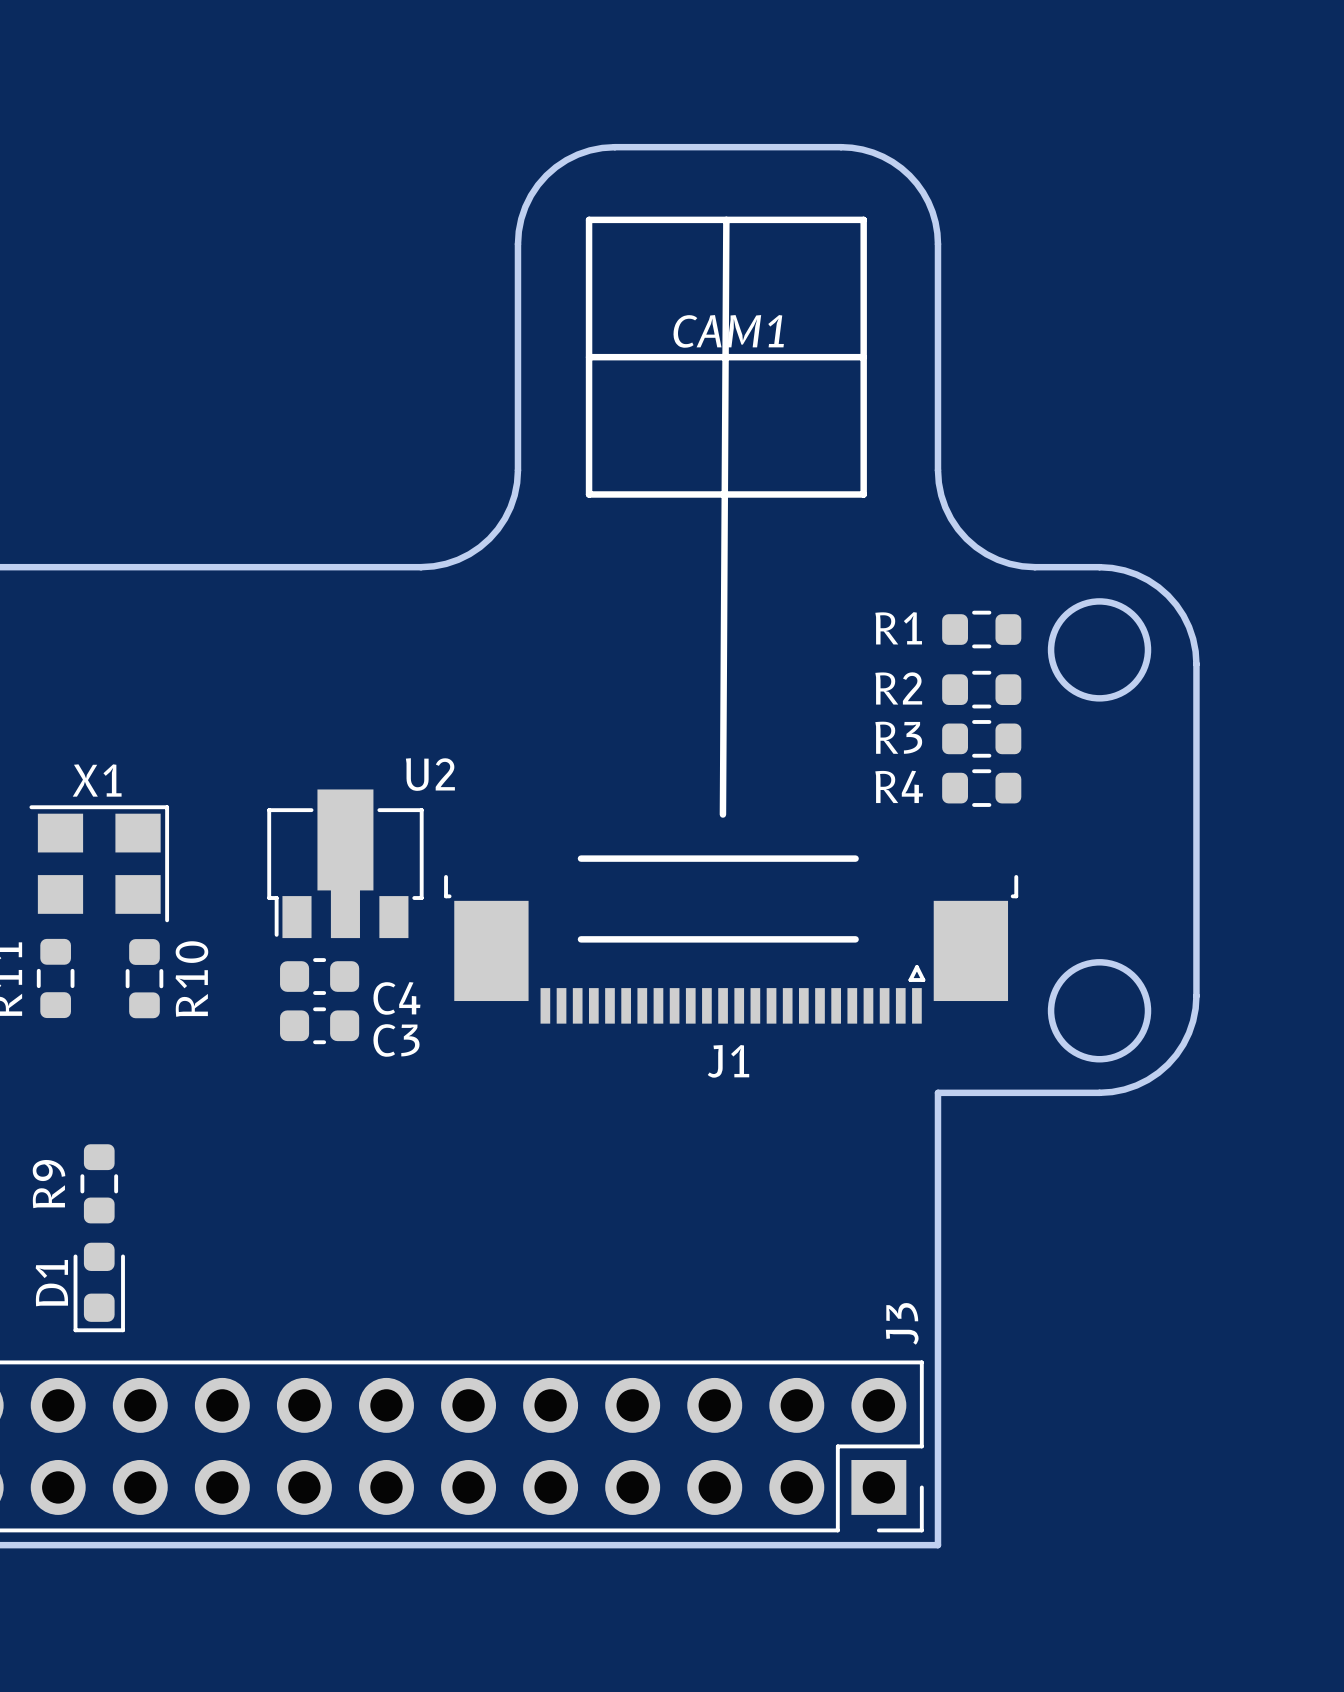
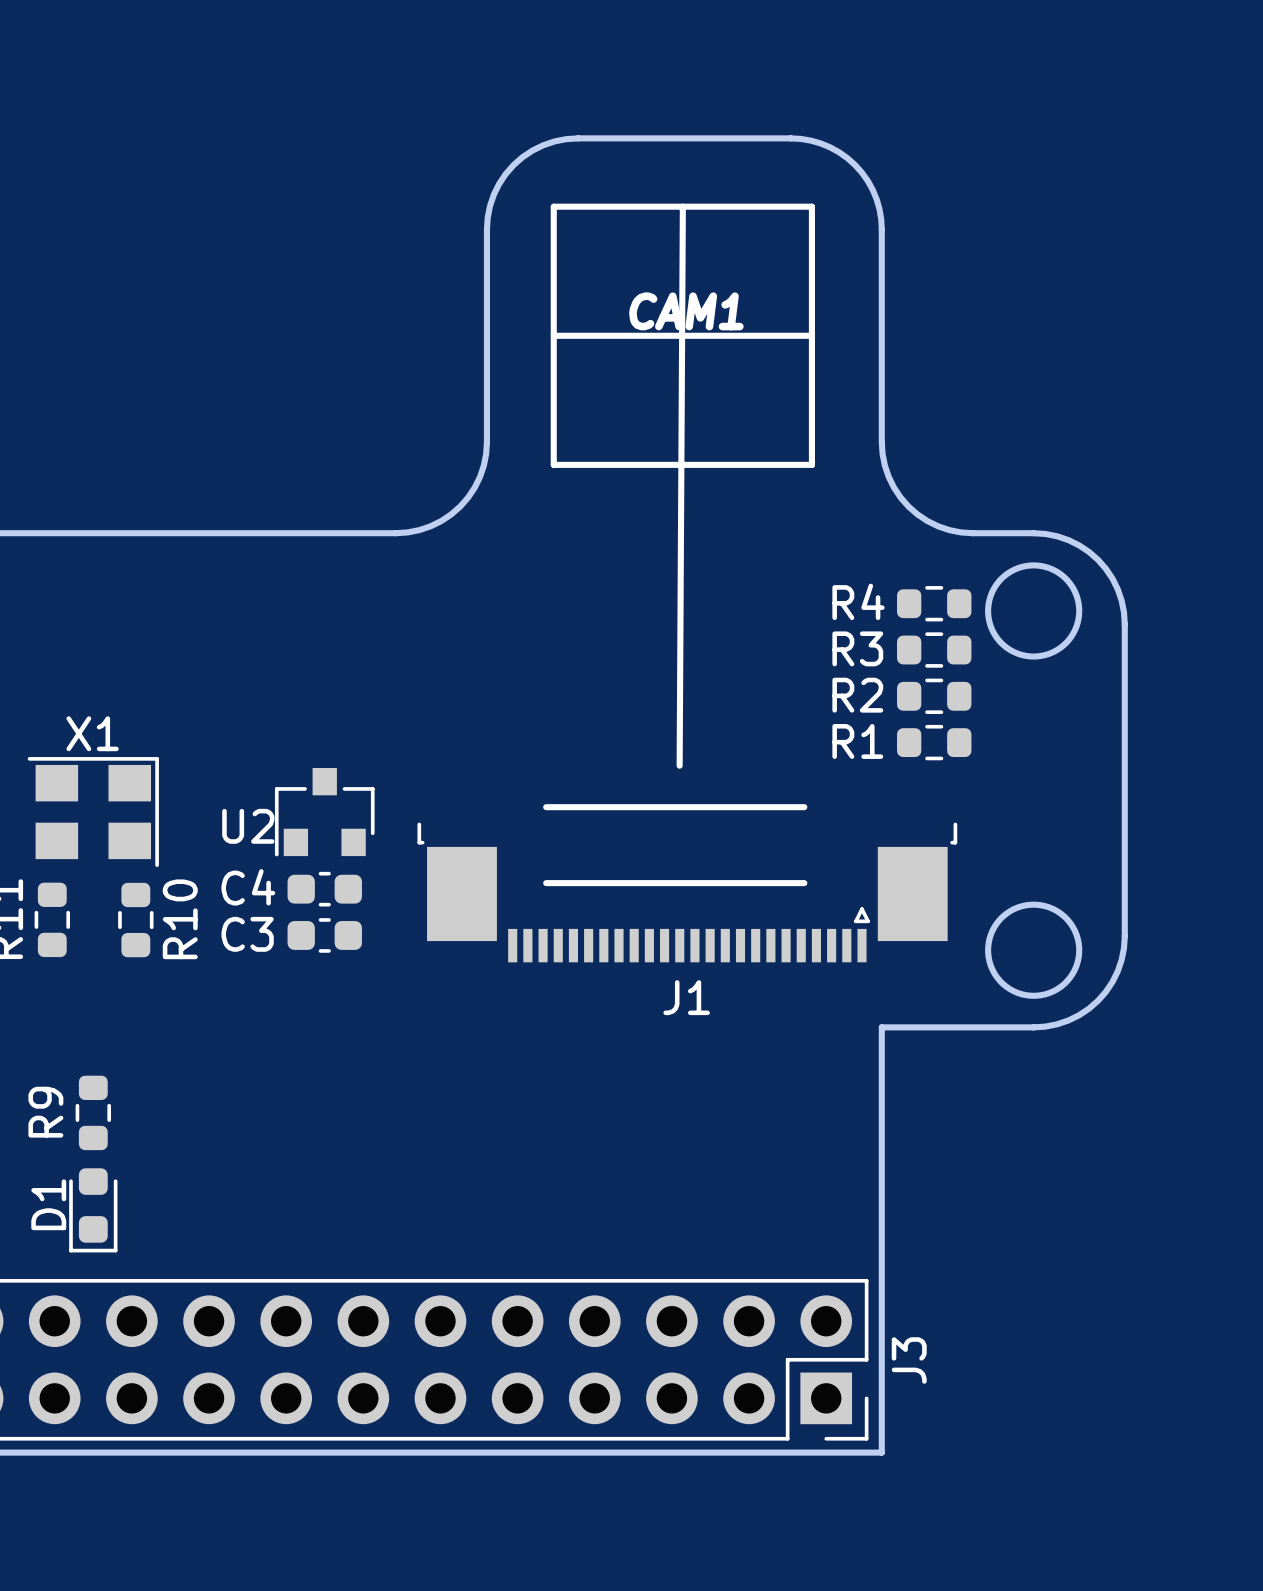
R1 position: (981, 629) -> (934, 742)
R2 position: (981, 689) -> (934, 696)
R3 position: (981, 738) -> (934, 650)
U2 name position: U2 (430, 774) -> U2 (248, 826)
R4 position: (981, 788) -> (934, 603)
U2 footprint: [267, 789, 424, 939] -> [274, 767, 375, 857]
C4 position: (319, 976) -> (324, 889)
C4 name position: C4 (396, 998) -> C4 (248, 887)
C3 position: (319, 1025) -> (324, 935)
C3 name position: C3 (396, 1040) -> C3 (247, 934)
J3 name position: J3 (902, 1323) -> J3 (909, 1360)

